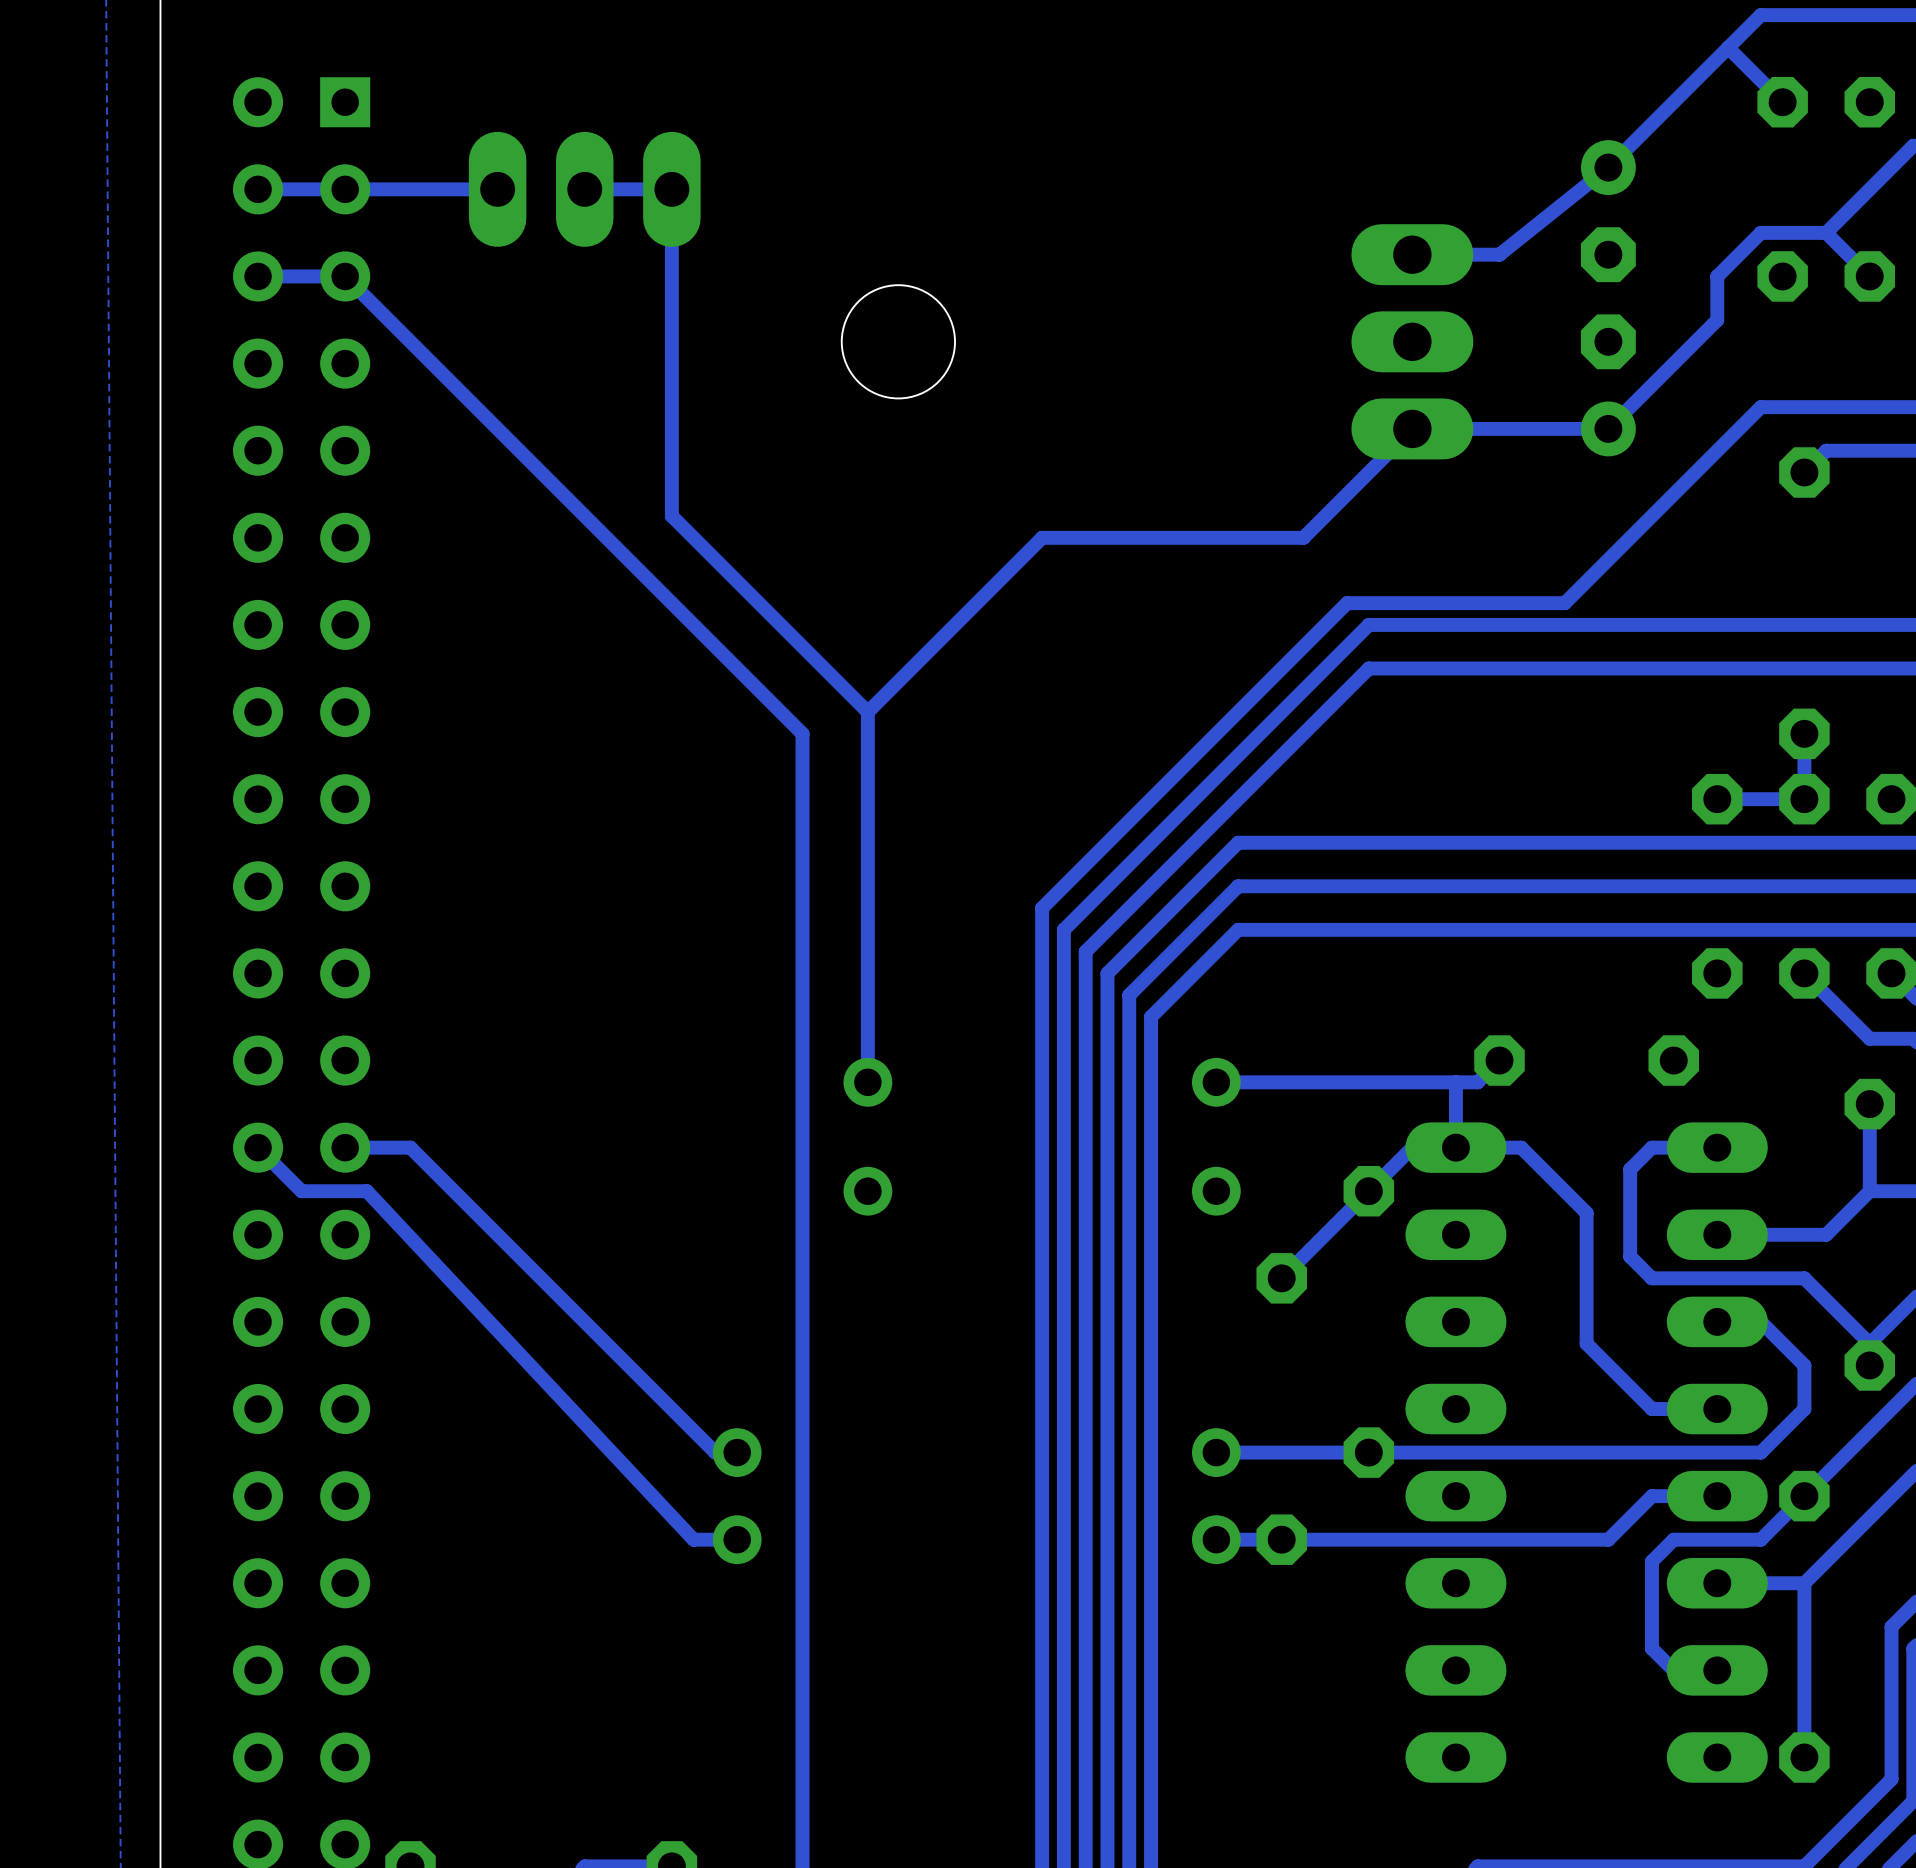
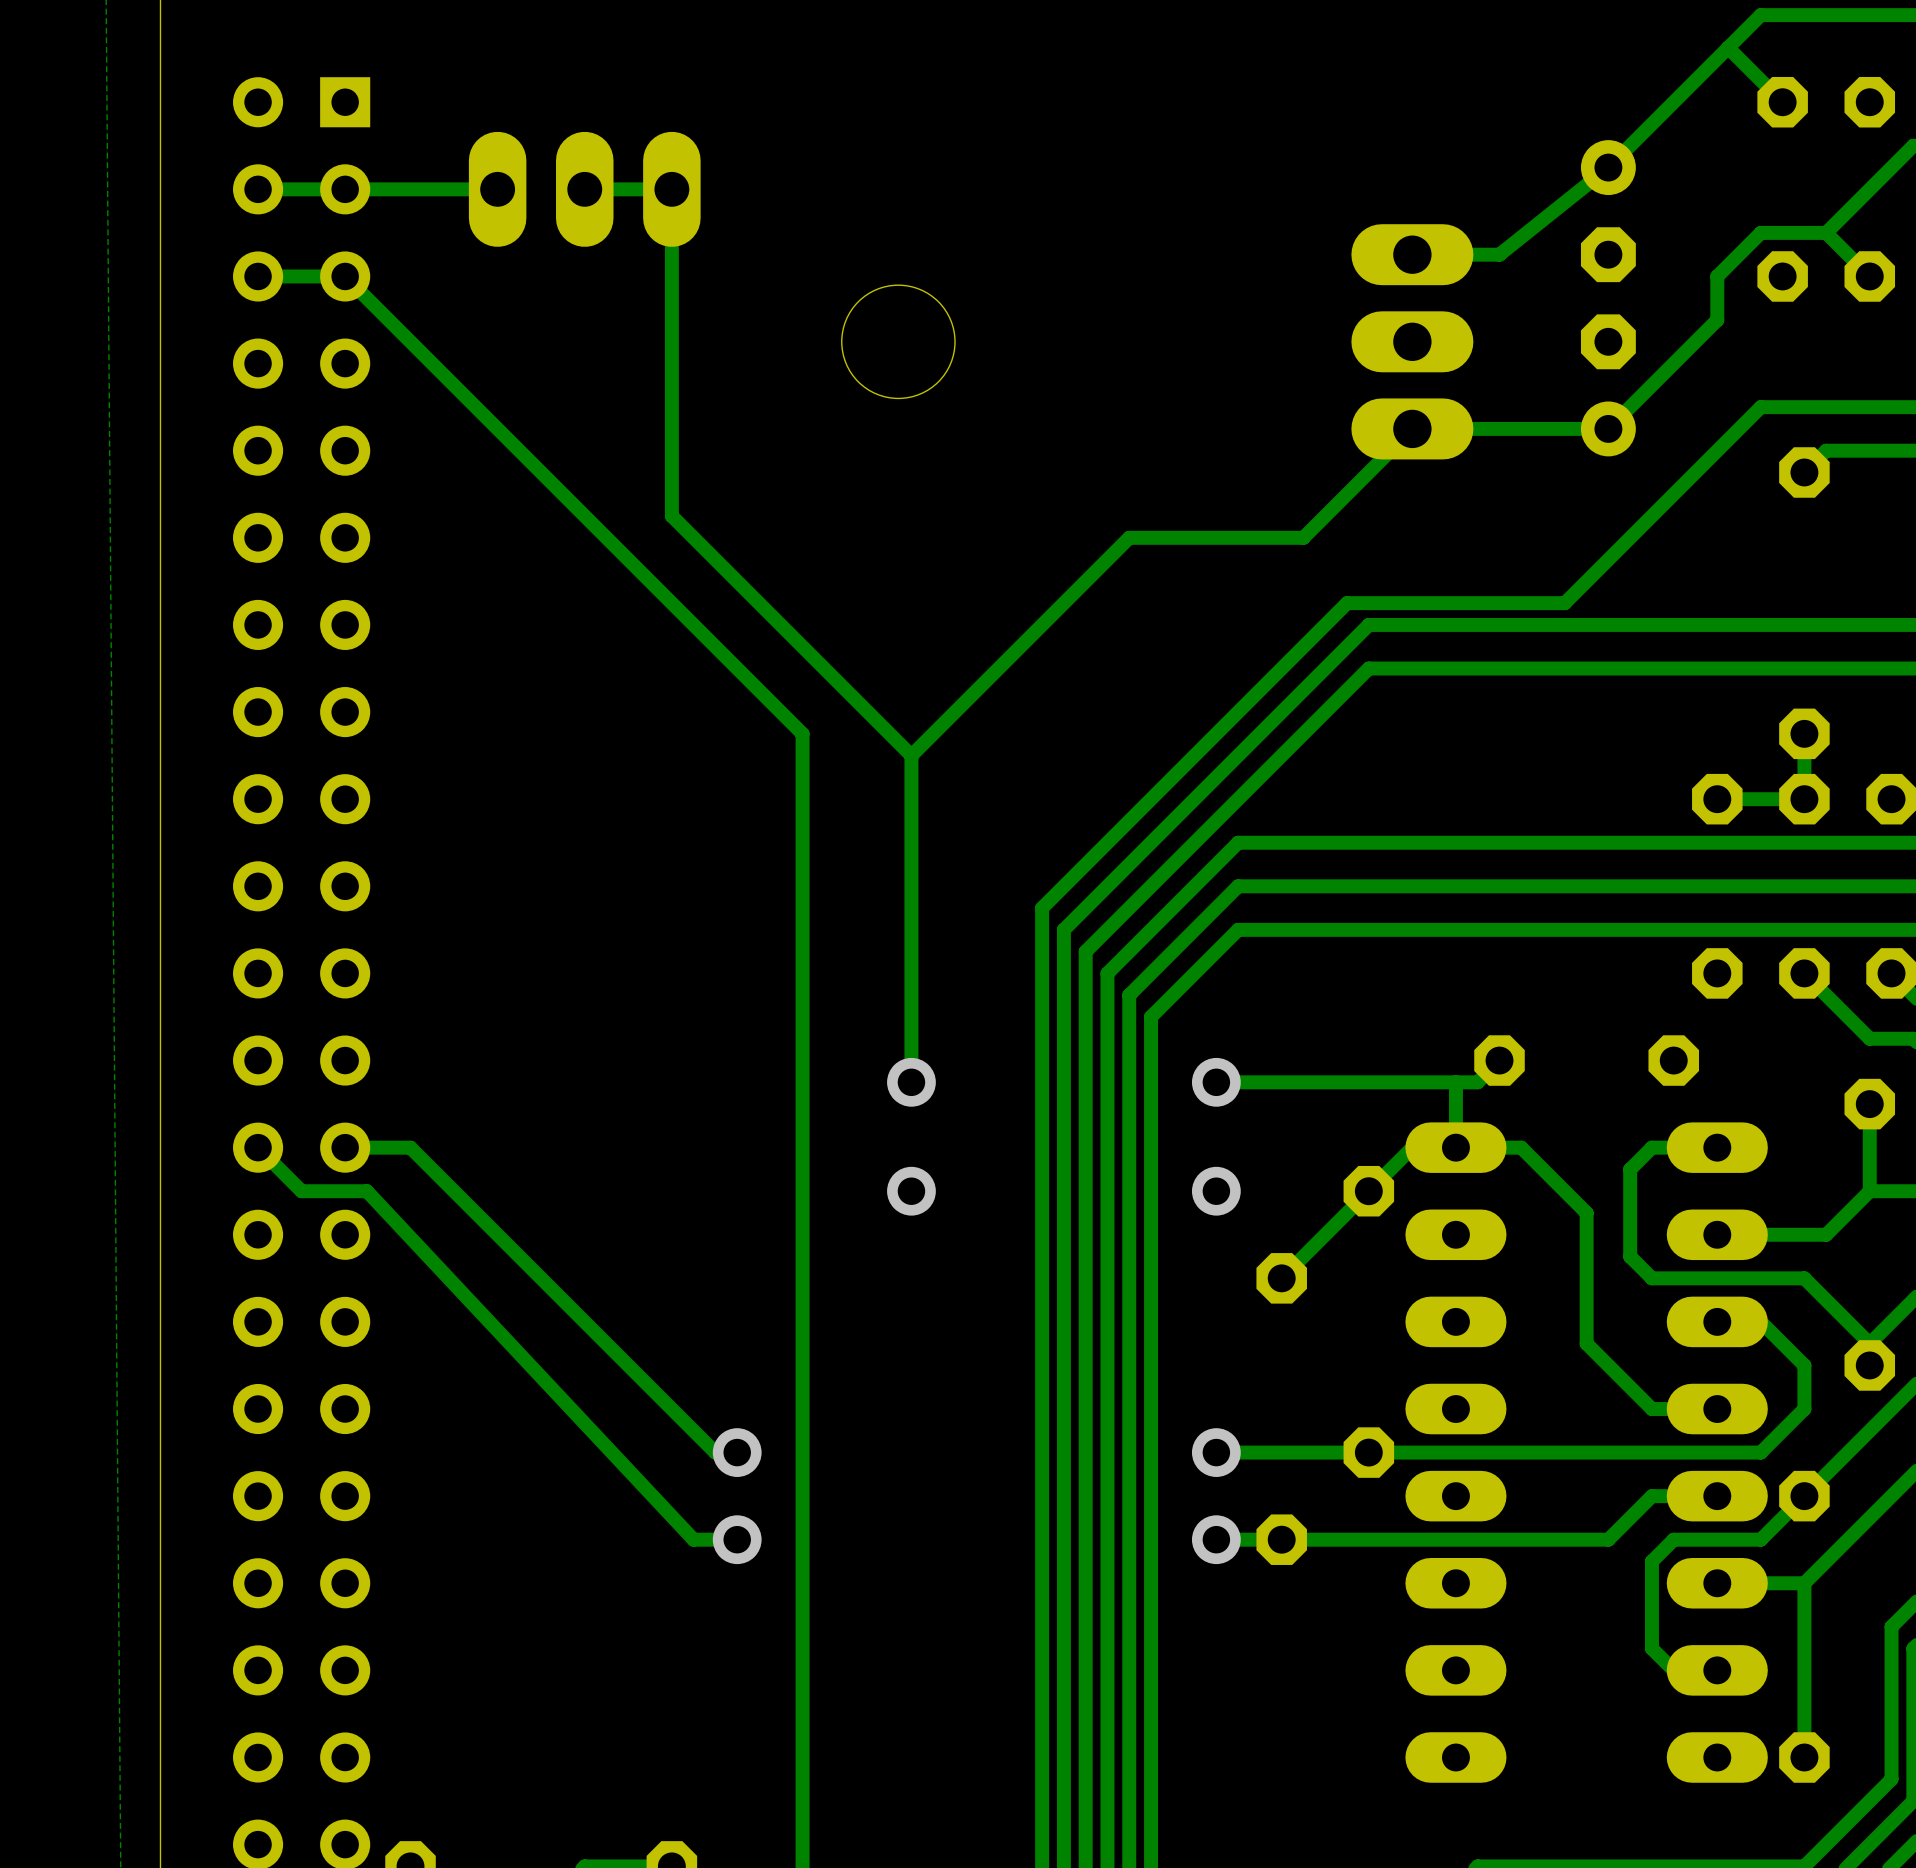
track: (1129, 537) (1042, 537) (867, 712) (867, 1082) -> (1129, 537) (911, 755)
track: none -> (867, 712) (911, 755)
track: none -> (911, 755) (911, 1082)
via position: (867, 1082) -> (911, 1082)
via position: (867, 1191) -> (911, 1191)

